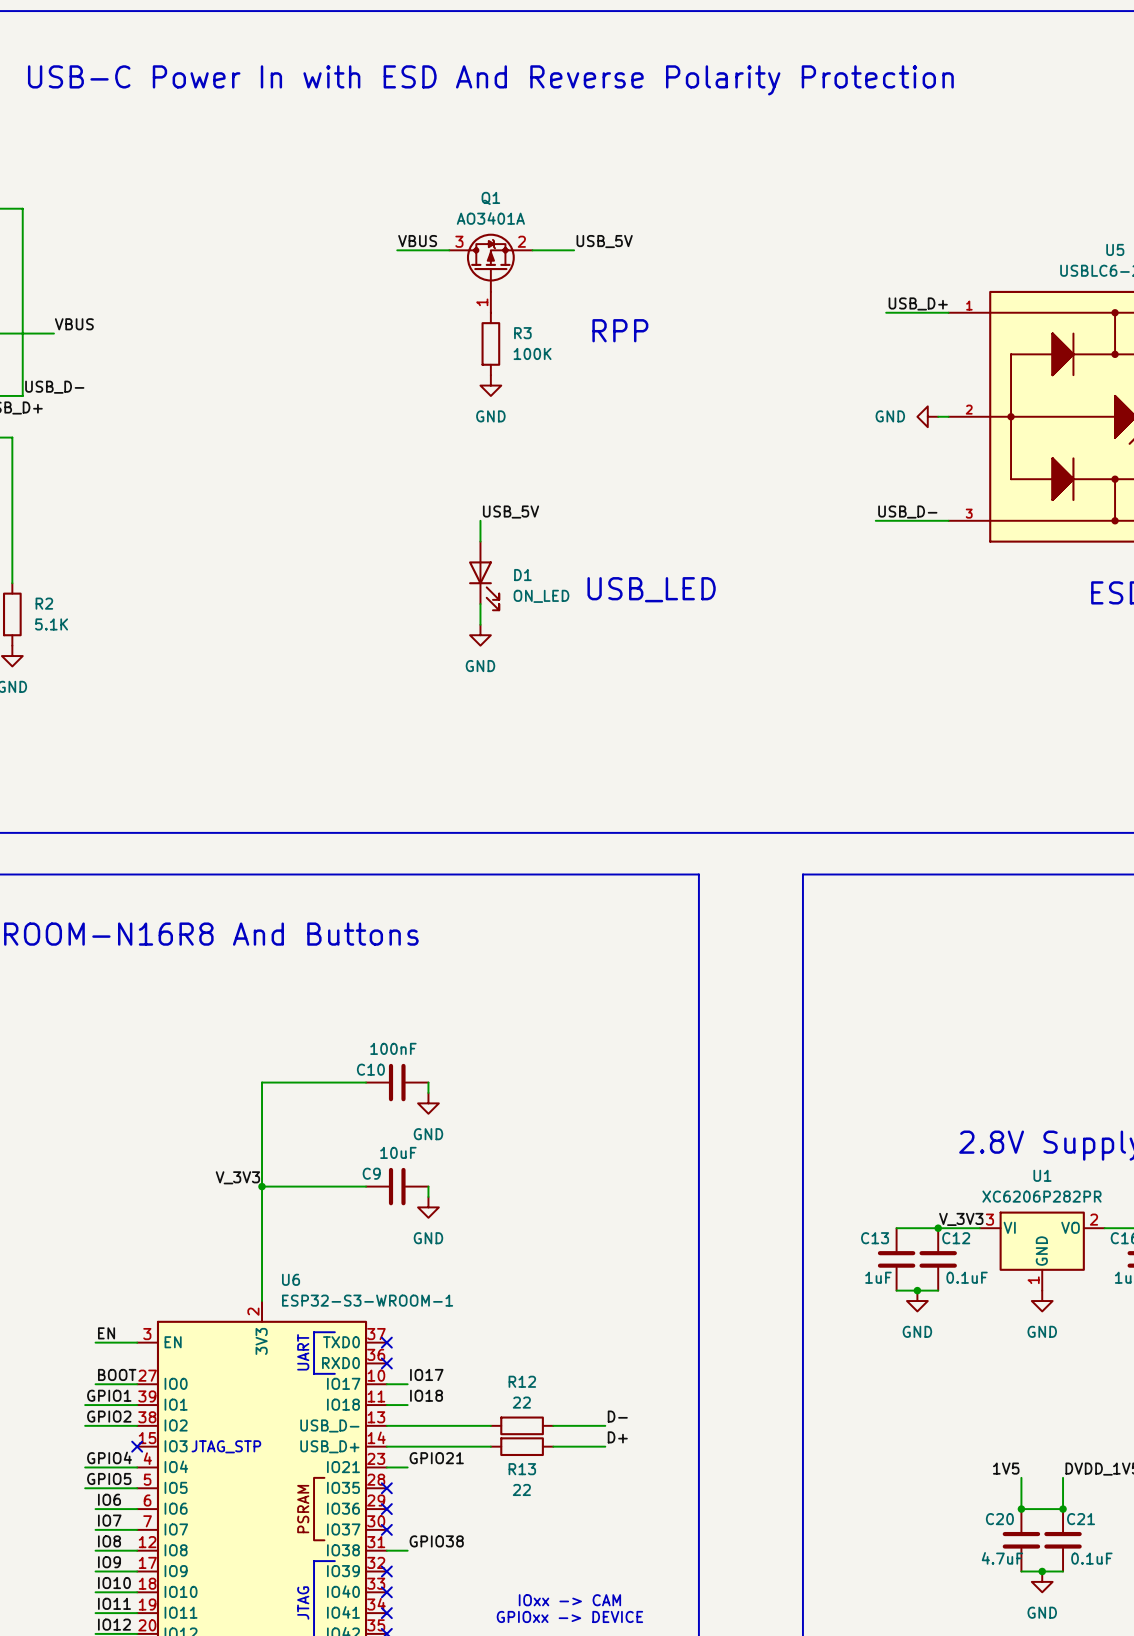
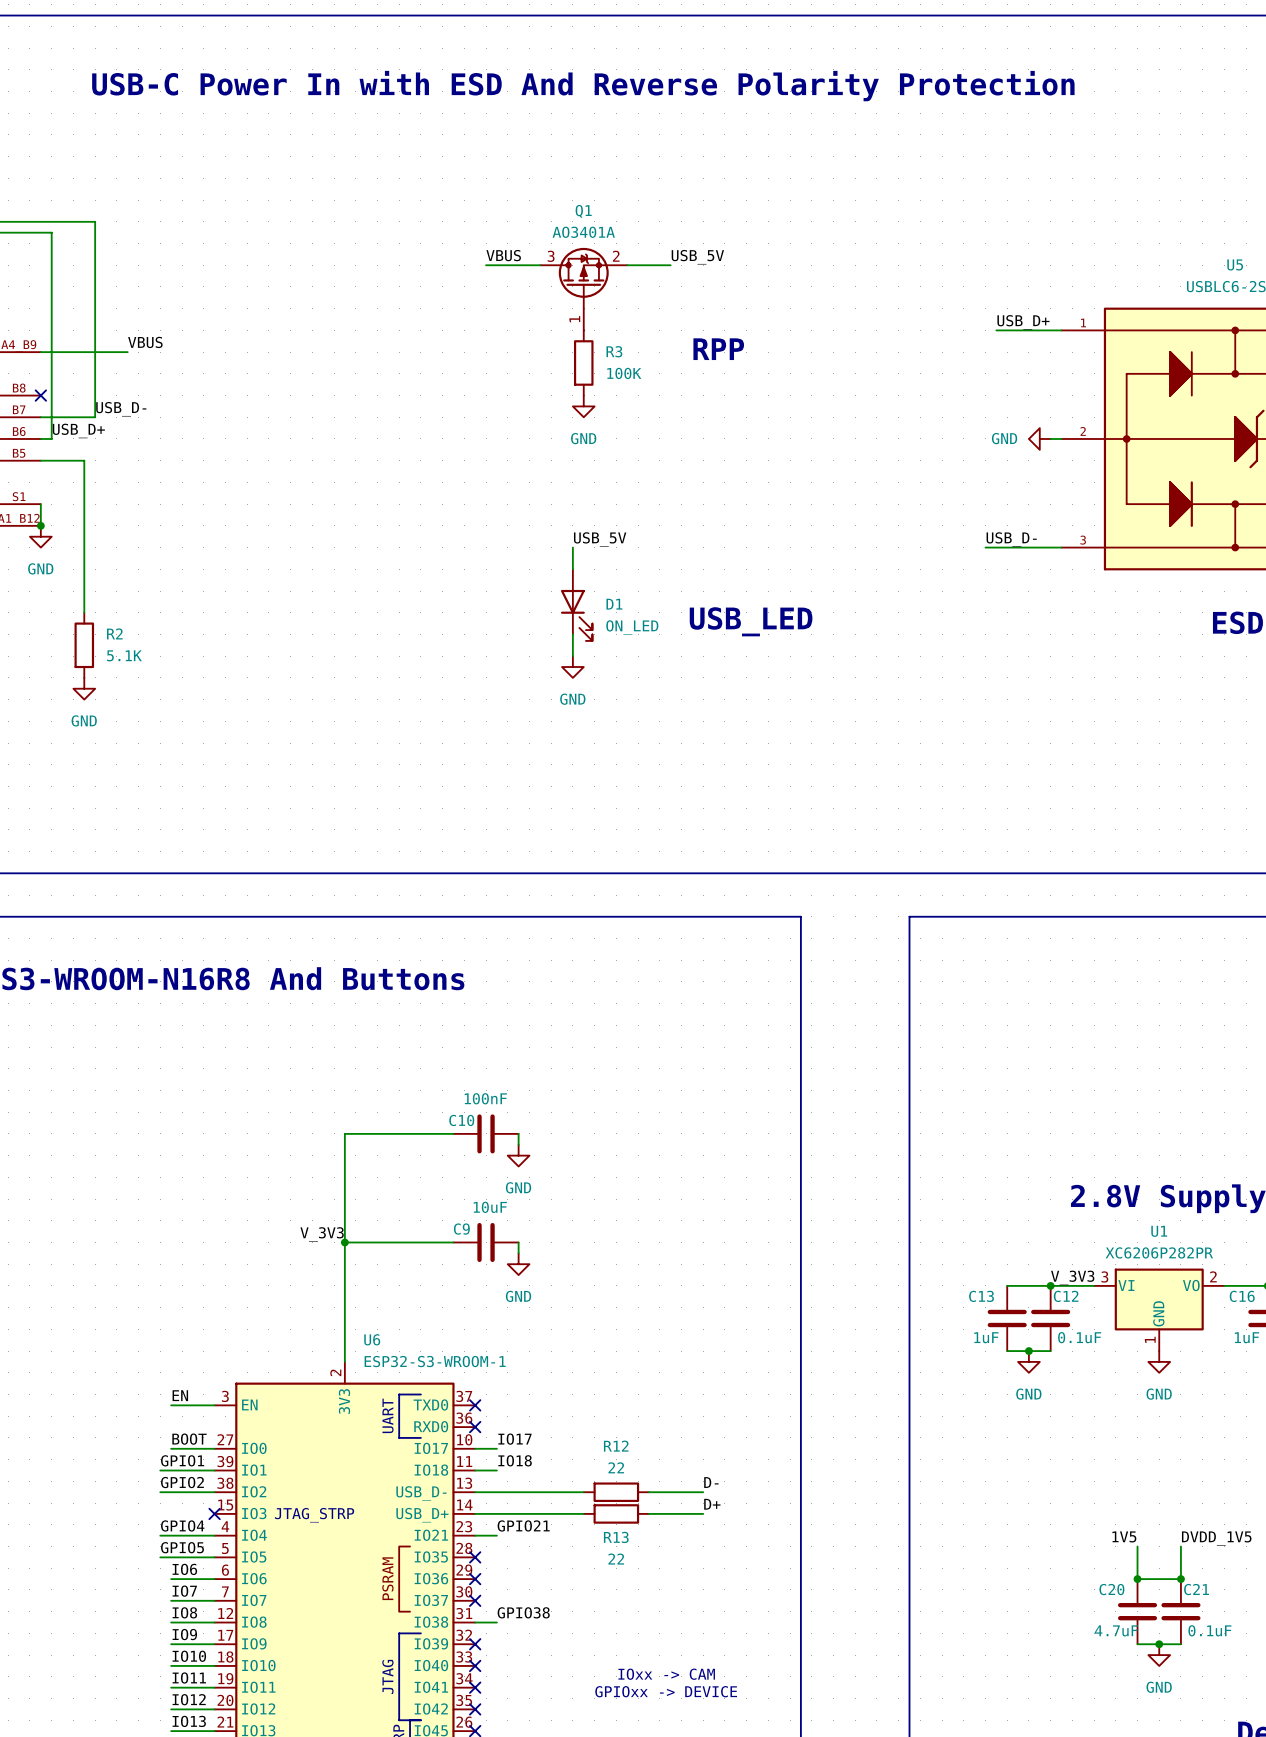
text: JTAG_STP (226, 1446) -> JTAG_STRP (314, 1515)

